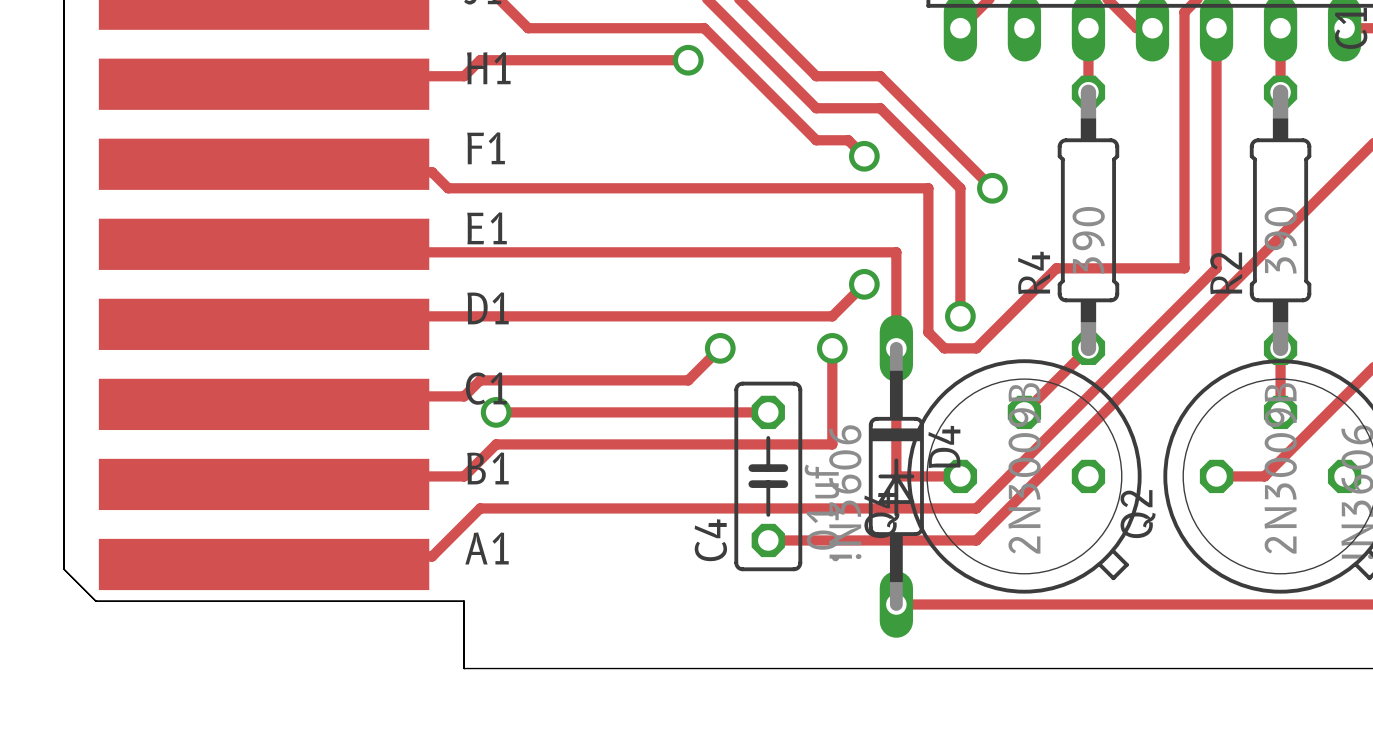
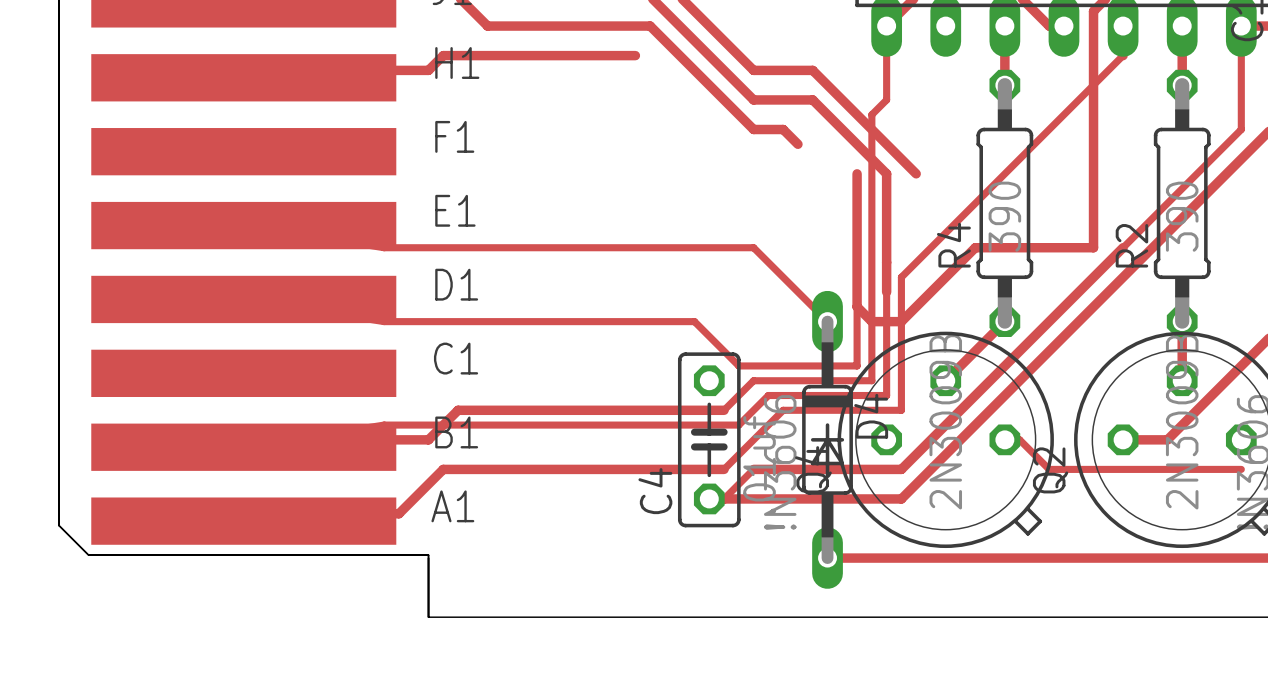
via: (688, 60) -> none
track: (1216, 60) (1216, 268) -> (1241, 26) (1241, 129) (1123, 247)
track: none -> (1123, 55) (901, 277) (901, 410) (783, 410) (724, 469)
via: (864, 156) -> none
track: (264, 164) (272, 172) (432, 172) (448, 188) (928, 188) -> none
via: (992, 188) -> none
track: (264, 244) (272, 252) (896, 252) (896, 476) (960, 476) -> (243, 225) (384, 247) (753, 247) (827, 321)
track: (864, 284) (832, 316) (272, 316) (264, 324) -> (857, 306) (857, 365) (738, 365) (694, 321) (384, 321) (243, 299)
via: (864, 284) -> none
track: none -> (886, 292) (886, 395) (768, 395) (738, 425) (384, 425) (243, 447)
via: (960, 316) -> none
track: (720, 348) (688, 380) (480, 380) (464, 396) (272, 396) (264, 404) -> none
via: (720, 348) -> none
track: (832, 348) (832, 444) (784, 444) -> (886, 26) (886, 99) (871, 114) (871, 380) (753, 380) (724, 410)
via: (832, 348) -> none
track: (496, 412) (768, 412) -> none
via: (496, 412) -> none
track: none -> (1004, 439) (1019, 439) (1049, 469) (1241, 469)
track: (784, 508) (816, 508) -> (724, 498) (753, 469)

